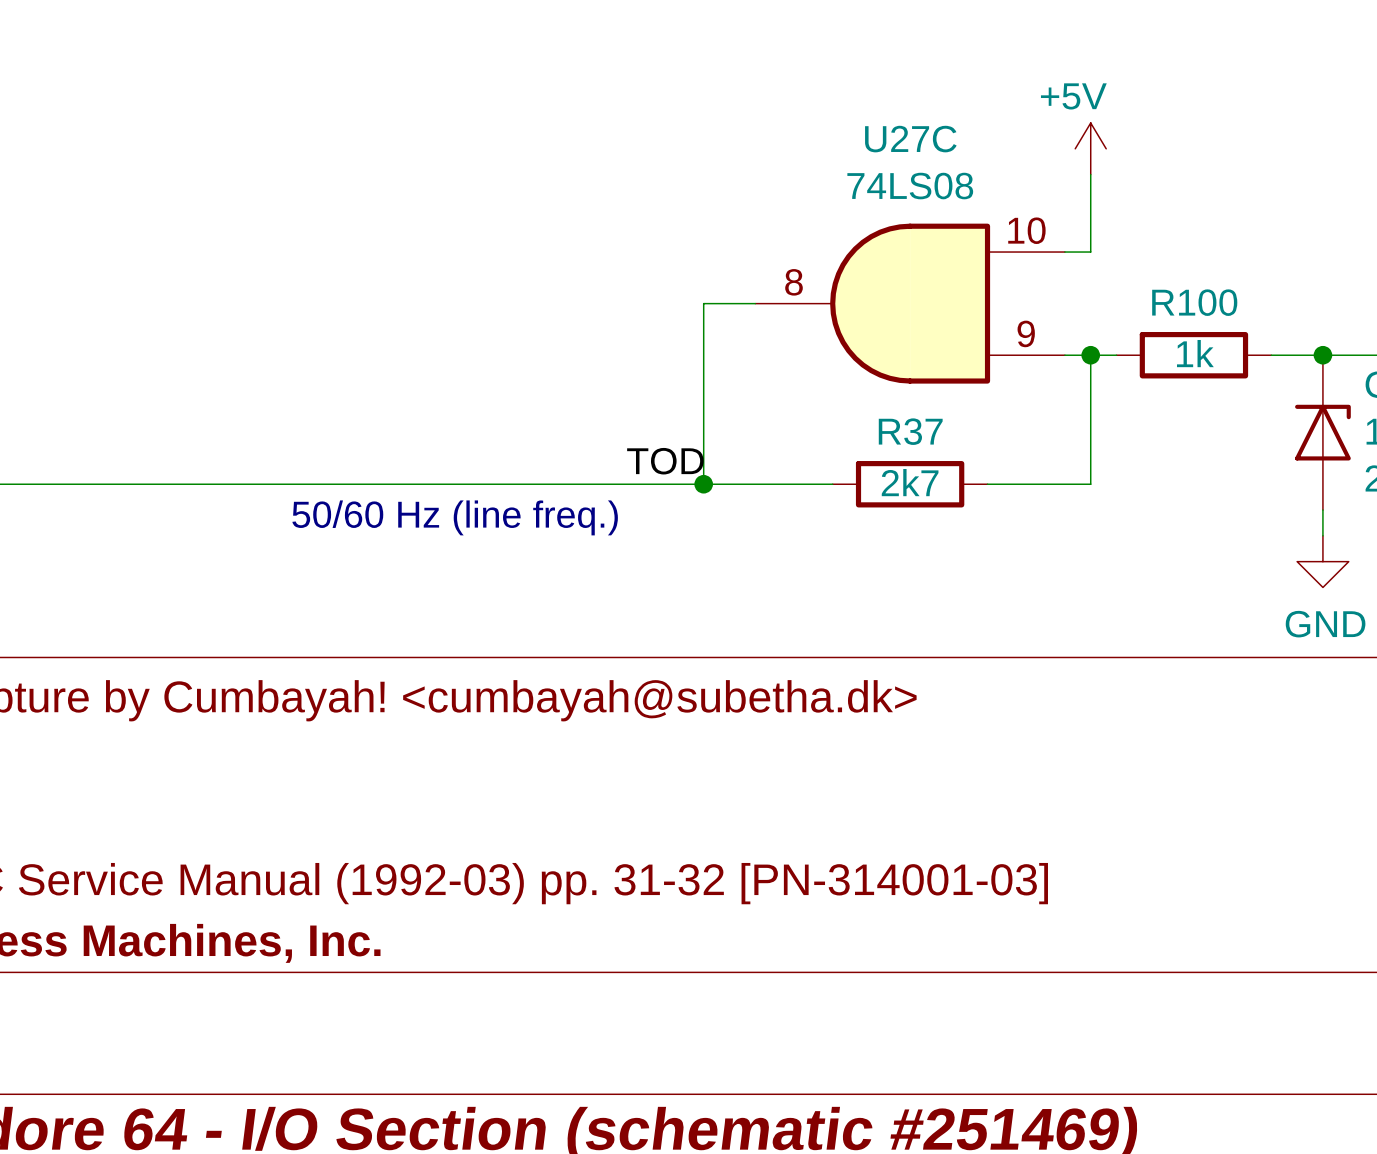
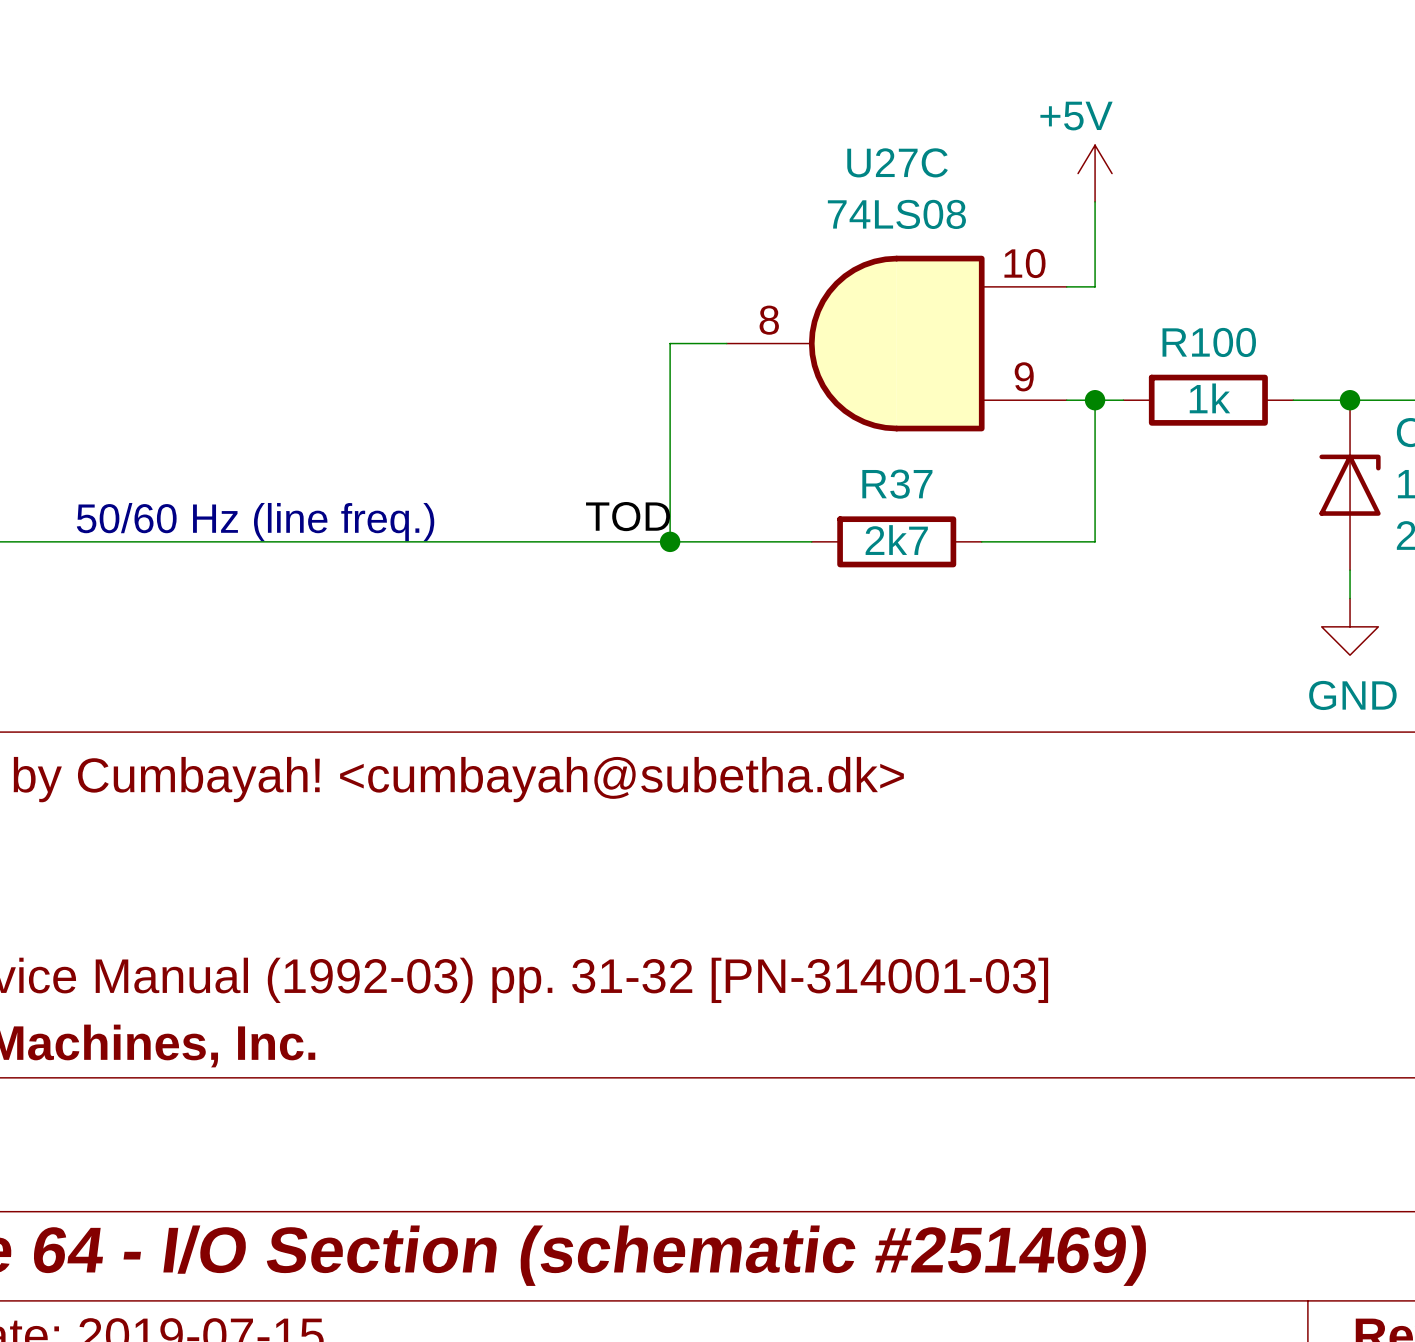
text position: 50/60 Hz (line freq.) (455, 517) -> 50/60 Hz (line freq.) (255, 522)

